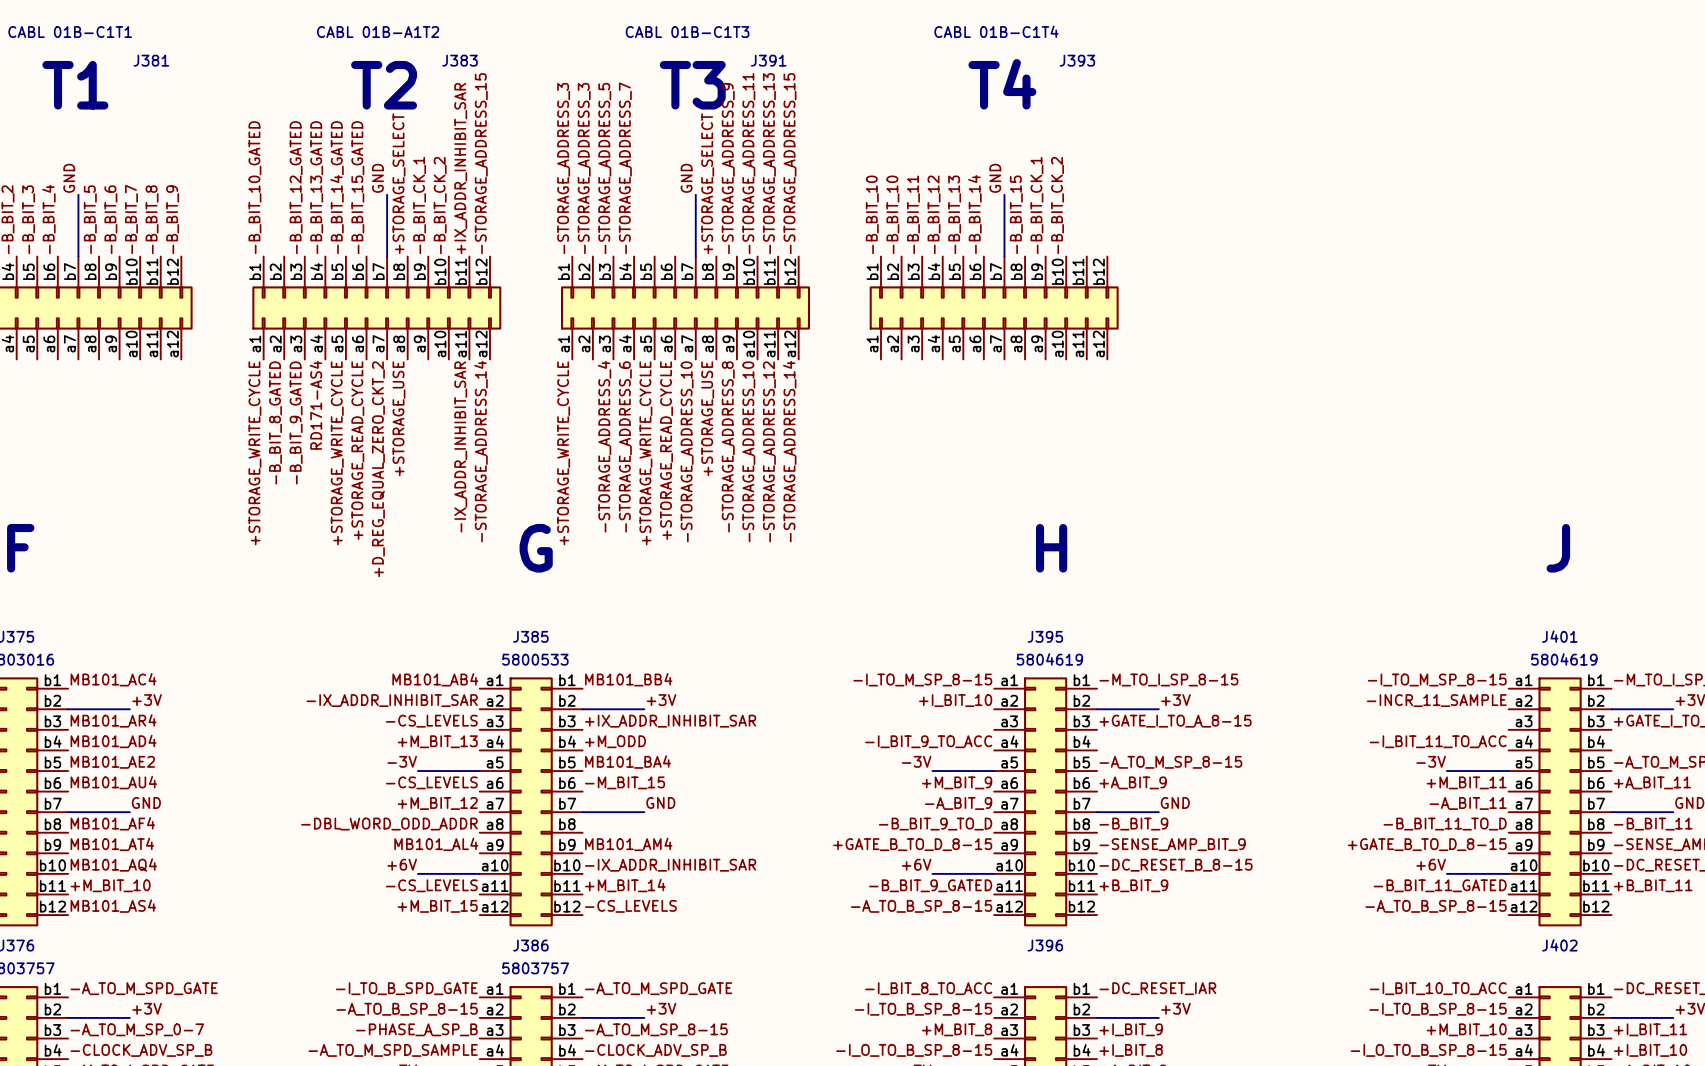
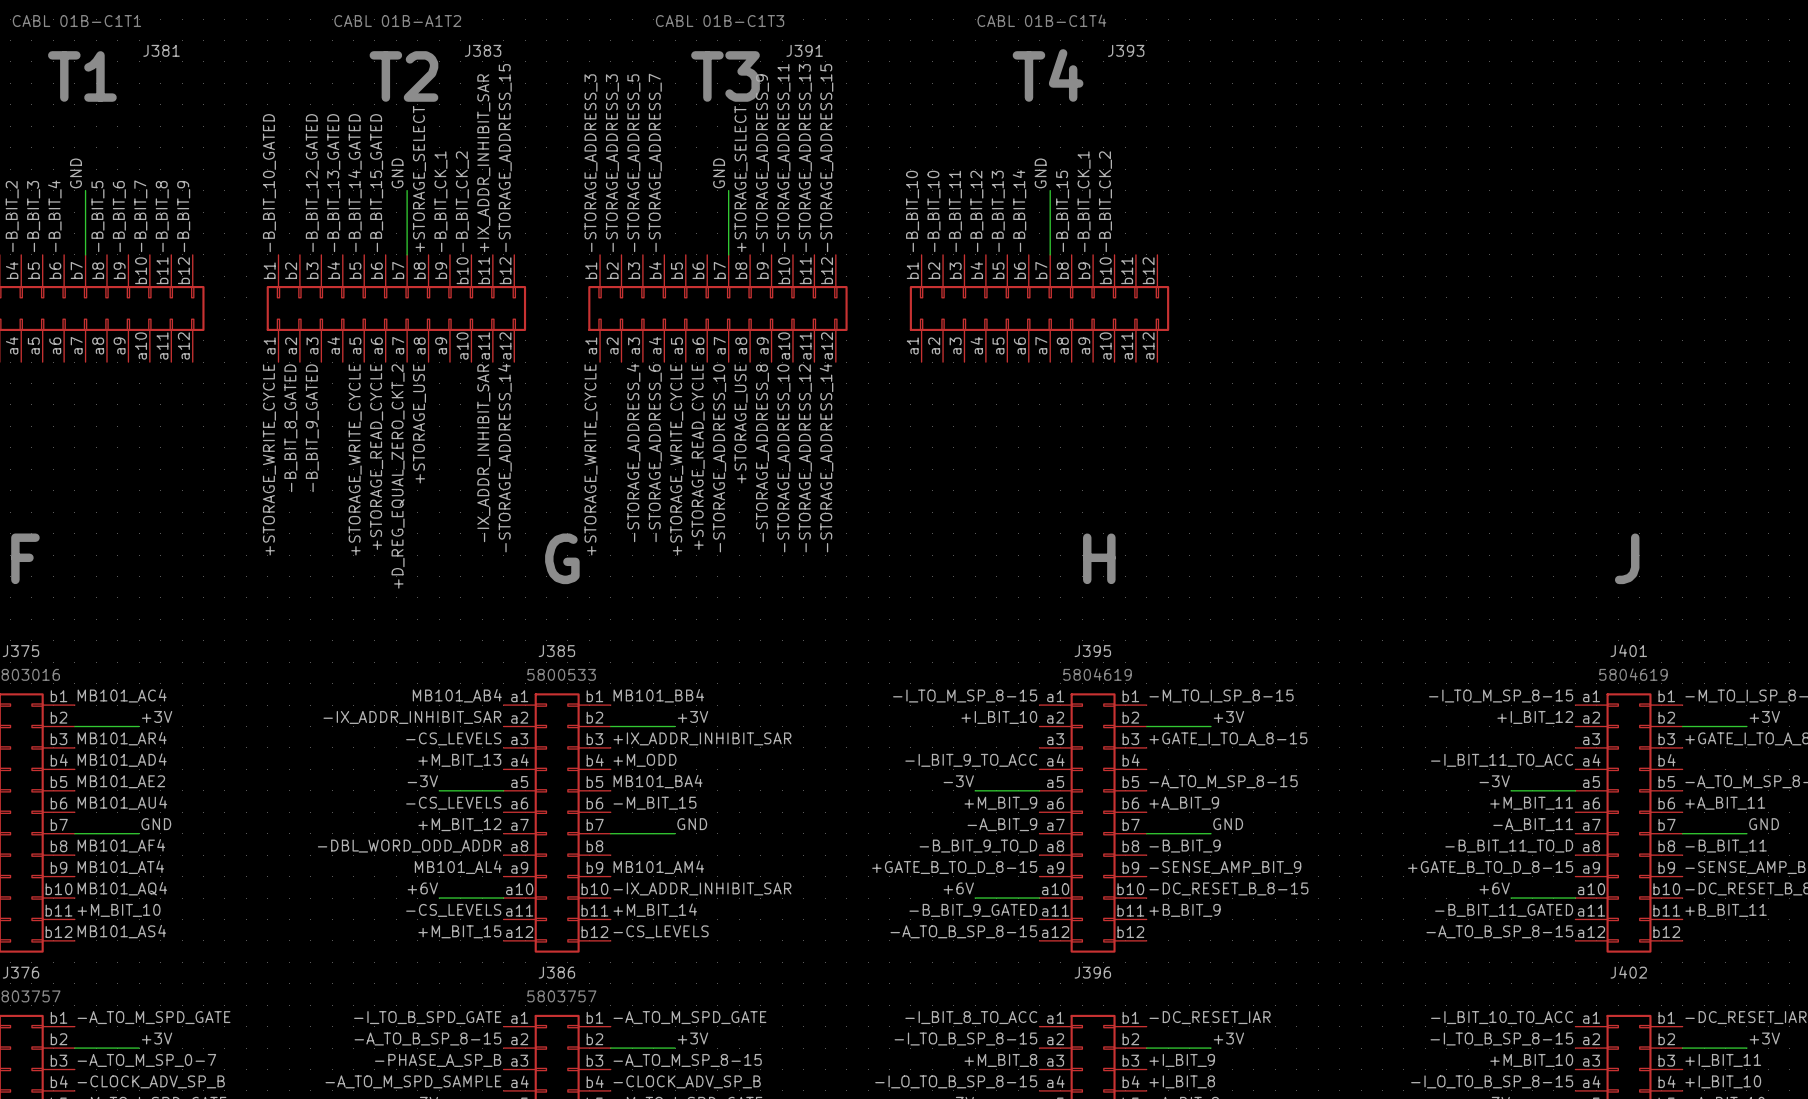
label: RD171-AS4 (315, 405) -> none
label: -INCR_11_SAMPLE (1436, 700) -> +I_BIT_12 (1535, 717)

